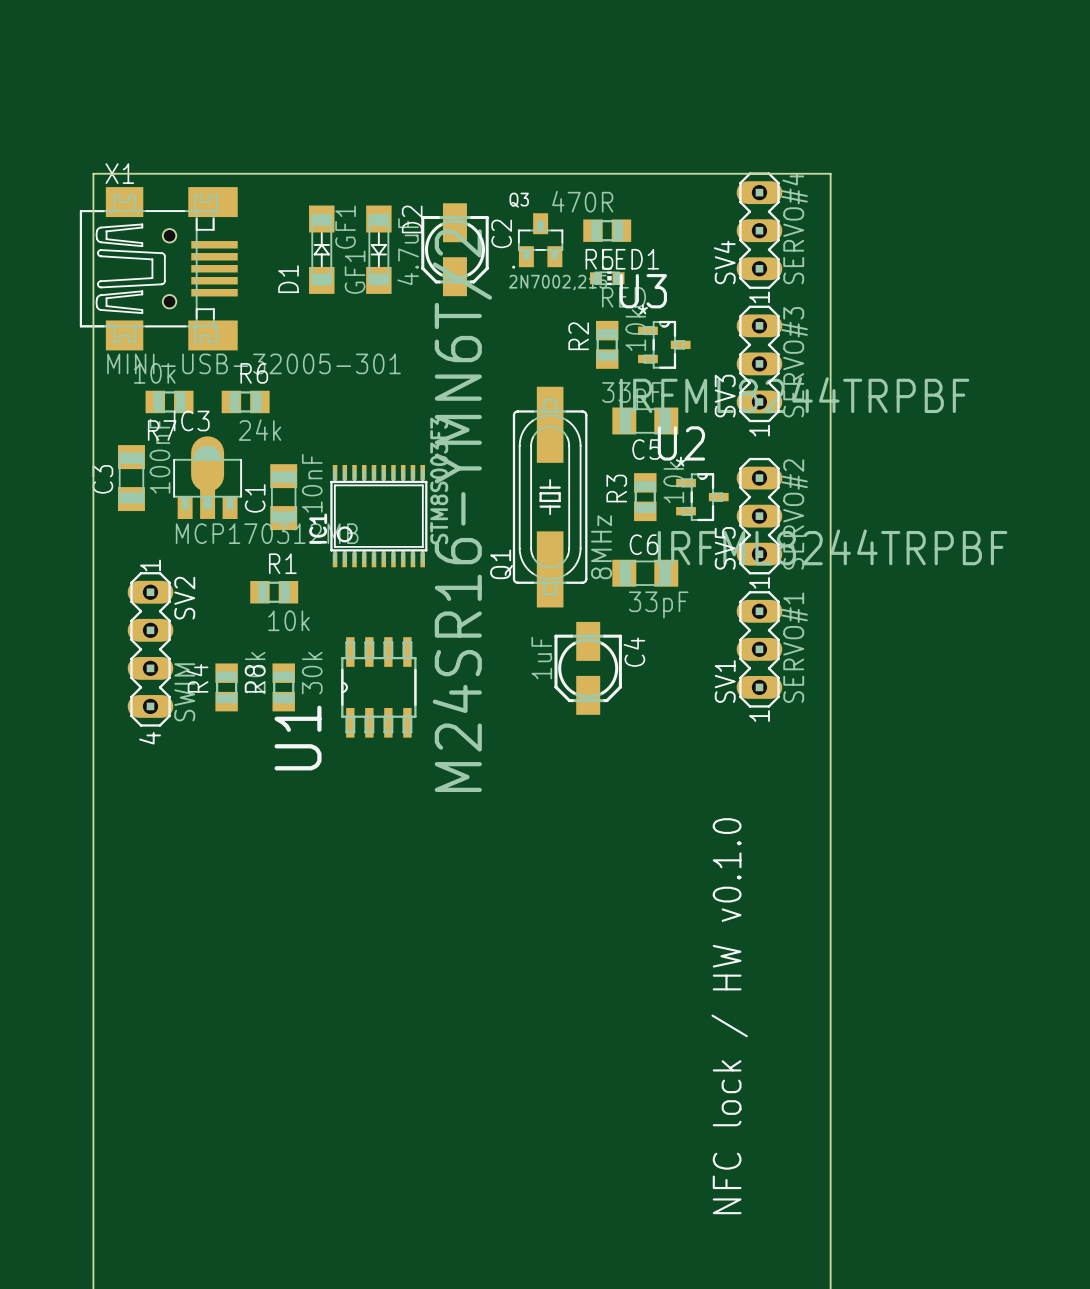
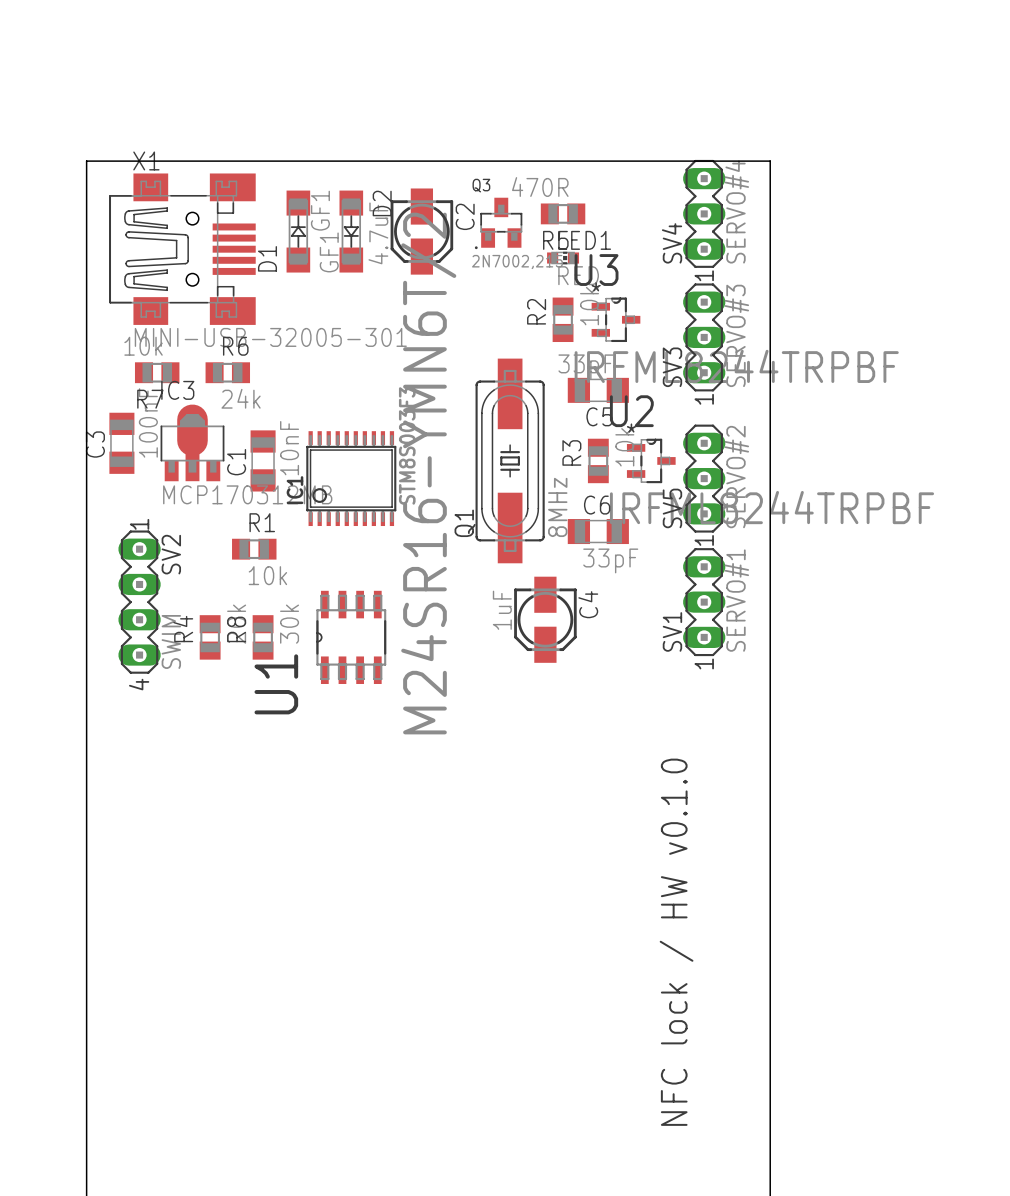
X1 position: (158, 268) -> (182, 249)

